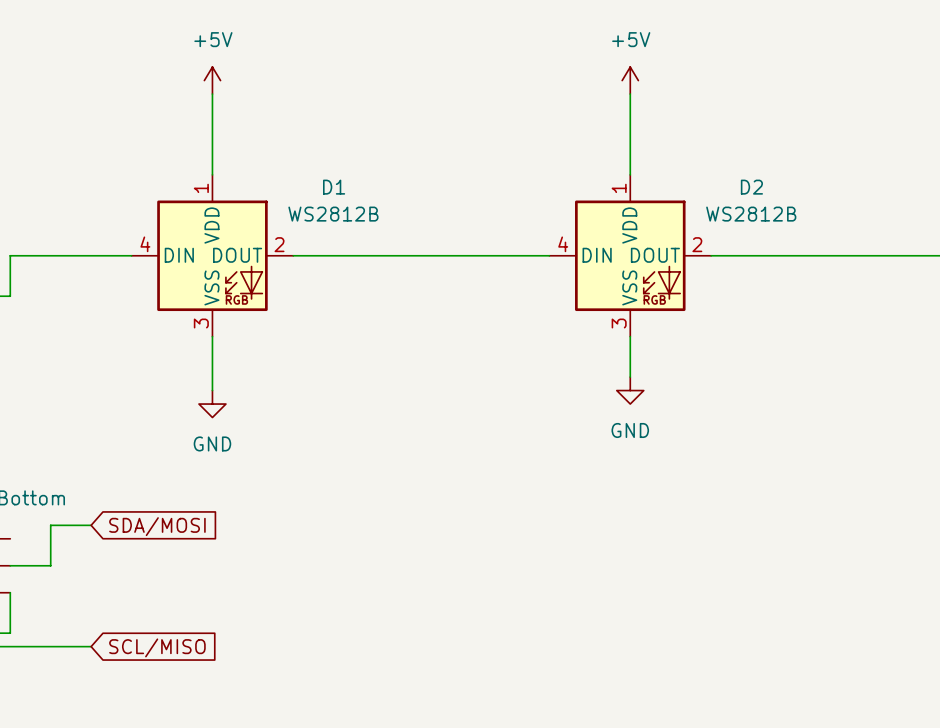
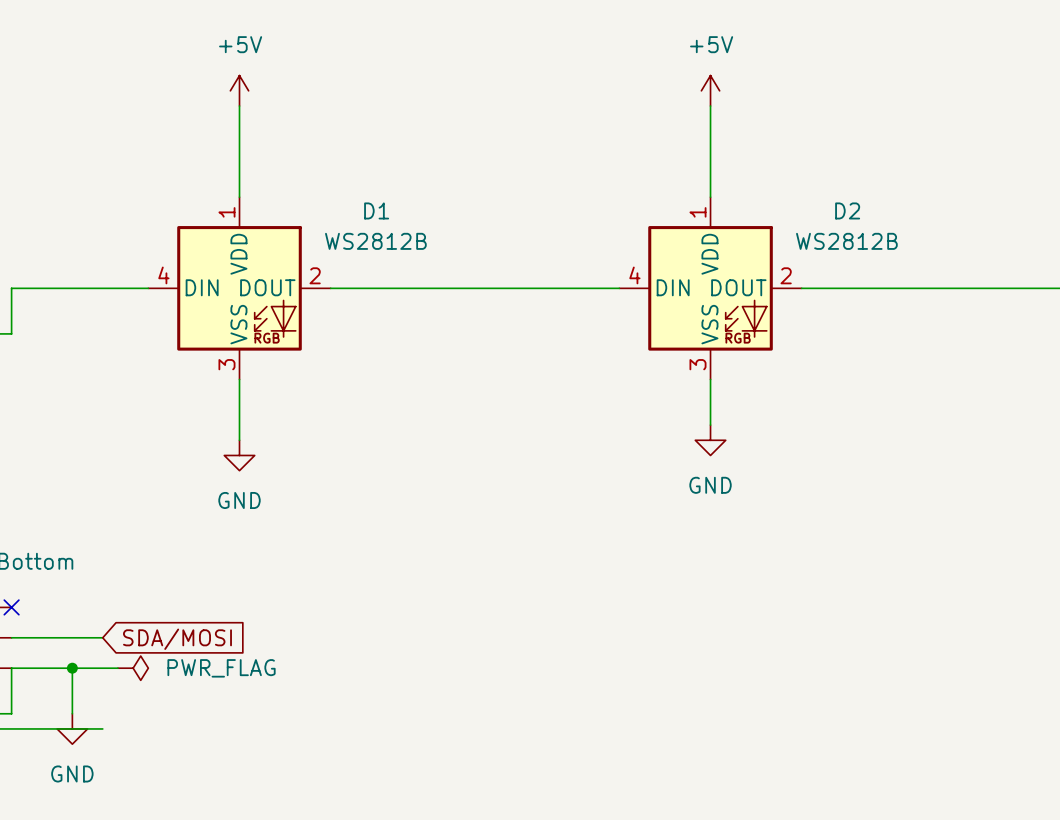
wire: (91, 525) (50, 525) (50, 565) -> (102, 637) (57, 637)
global label position: SDA/MOSI (157, 526) -> SDA/MOSI (177, 639)
no-connect mark: none -> (11, 607)
wire: none -> (11, 668) (117, 668)
wire: none -> (72, 668) (72, 713)
junction: none -> (72, 668)
power symbol: none -> PWR_FLAG (133, 668)
power symbol: none -> GND (72, 728)
global label: SCL/MISO (157, 647) -> none

